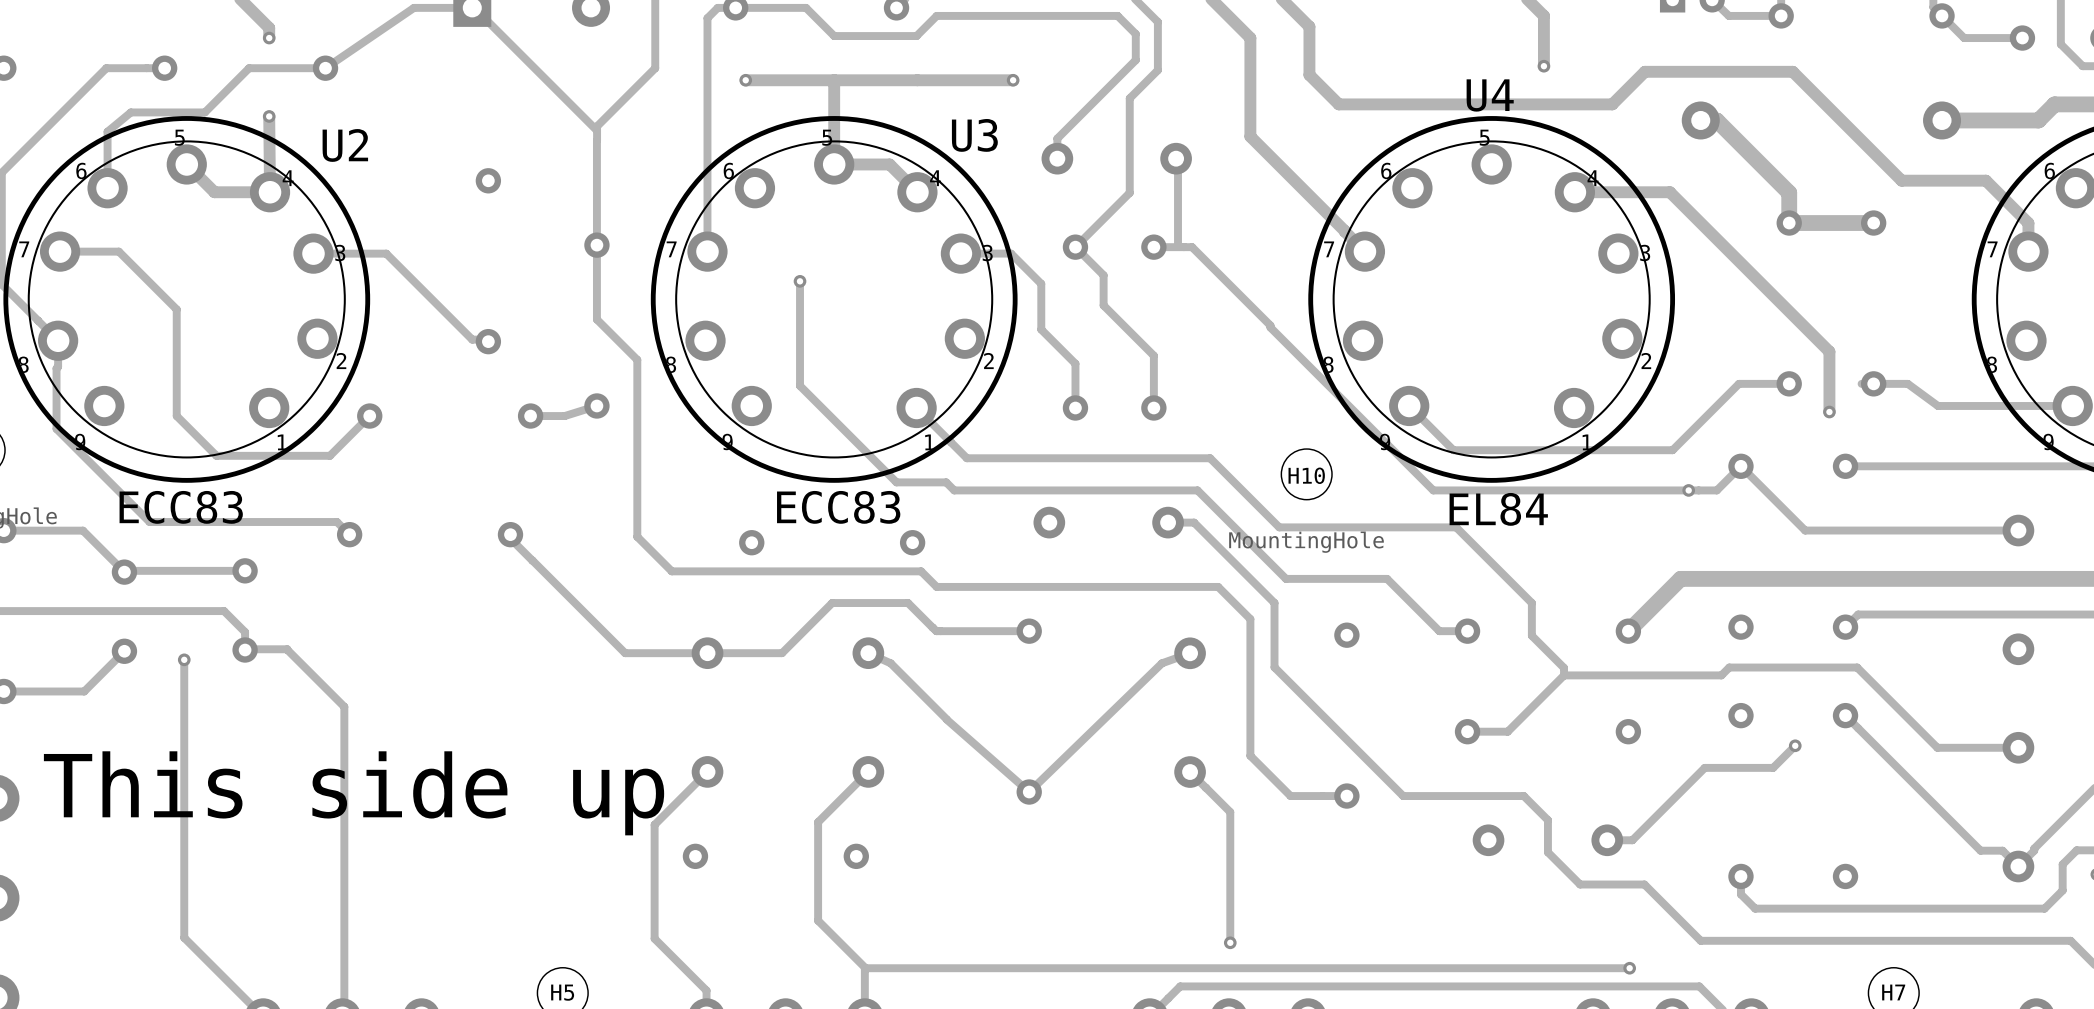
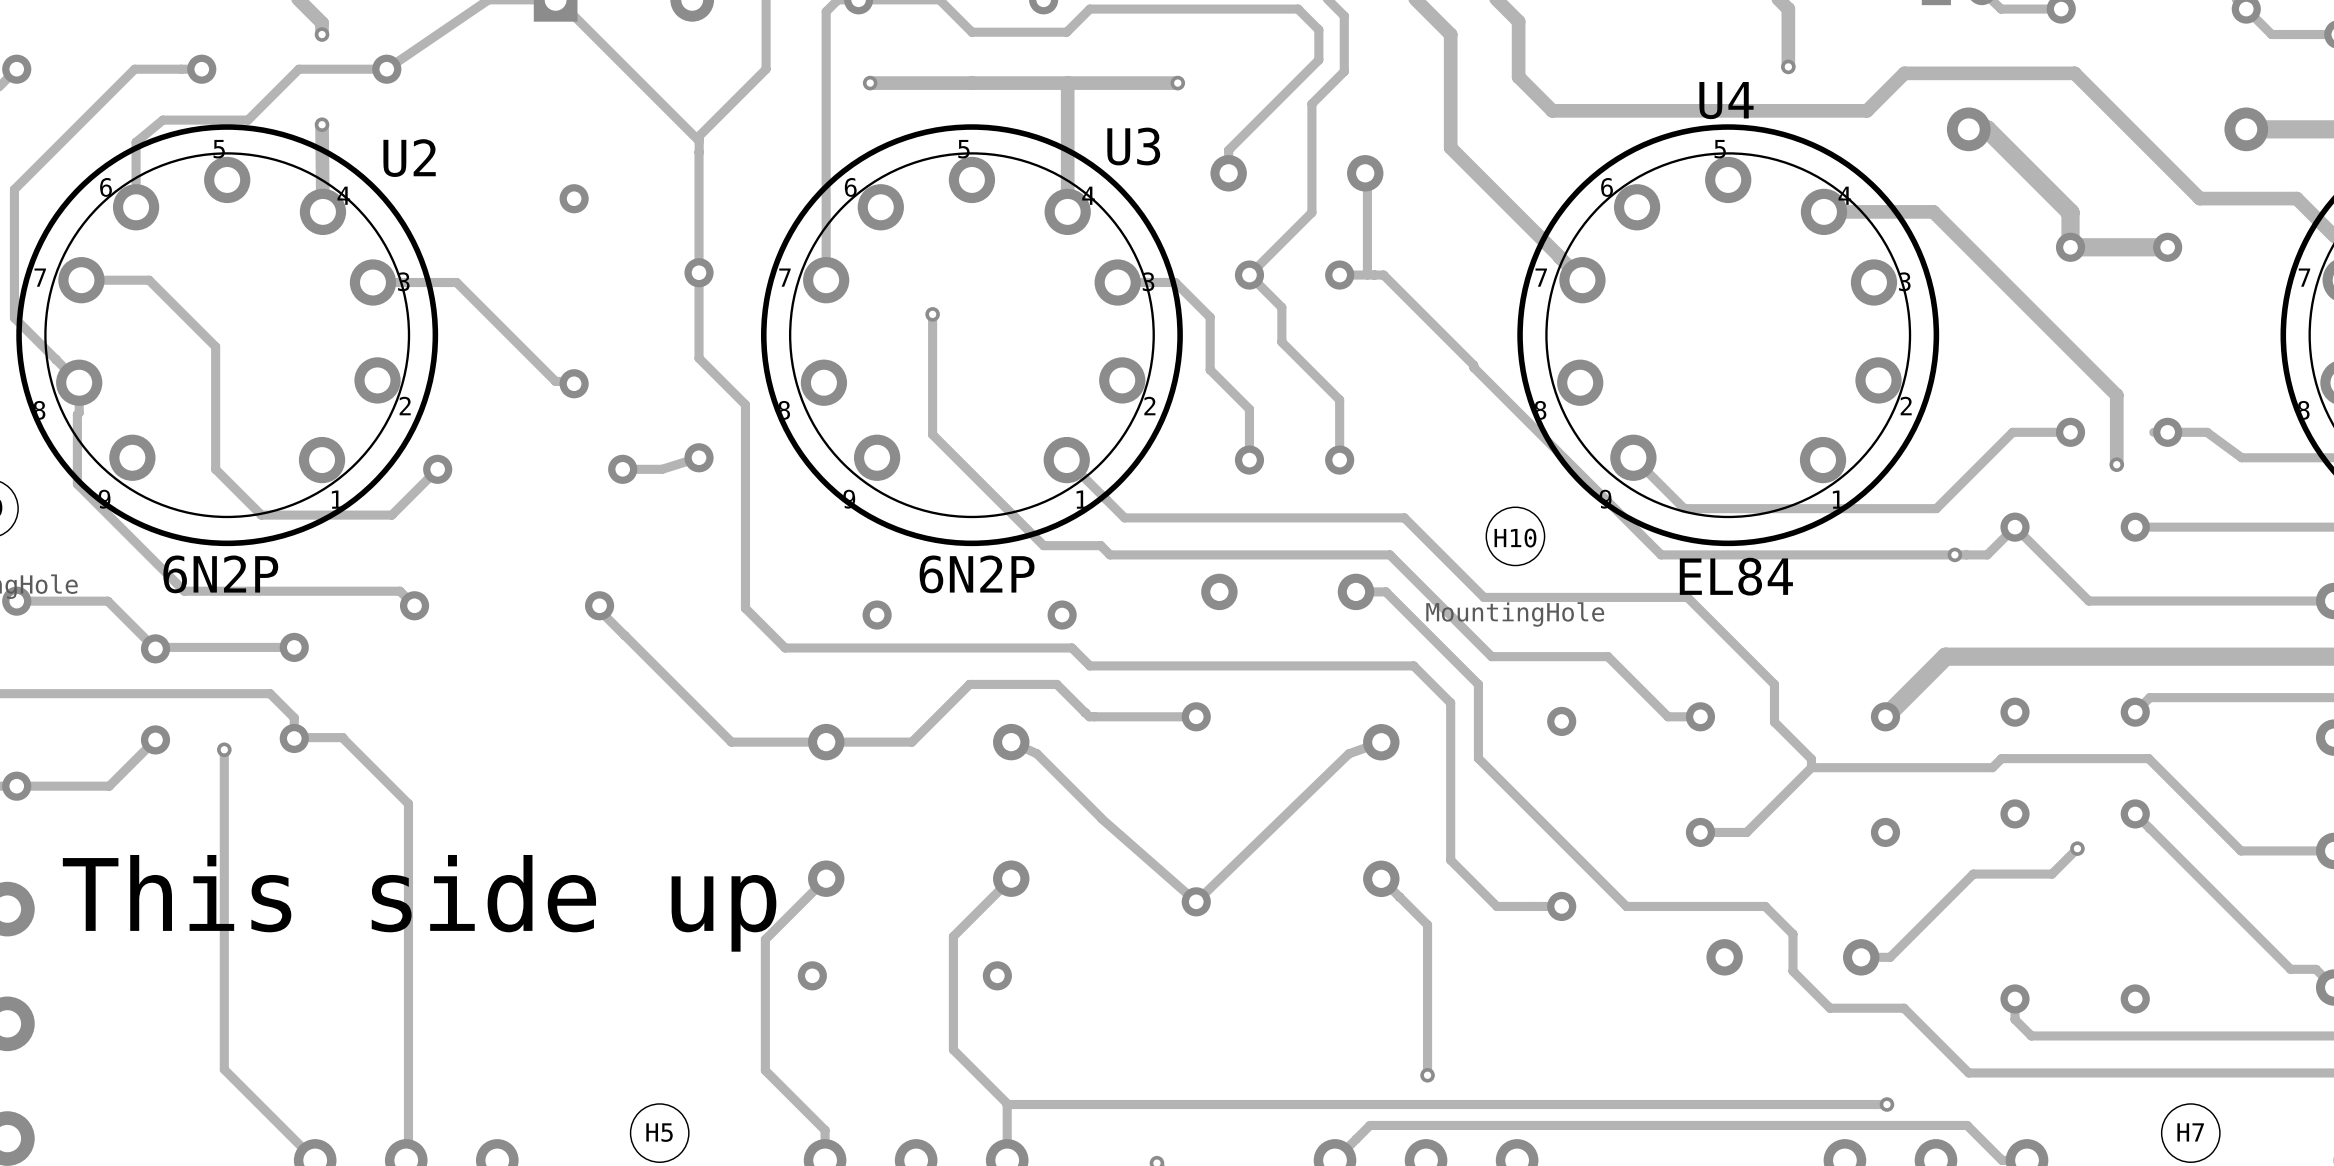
track: (834, 80) (834, 164) (889, 164) (917, 192) -> (1067, 83) (1067, 211)
track: (186, 164) (214, 192) (270, 192) -> none
U2 value: ECC83 (181, 507) -> 6N2P (220, 574)
U3 value: ECC83 (838, 507) -> 6N2P (977, 574)

